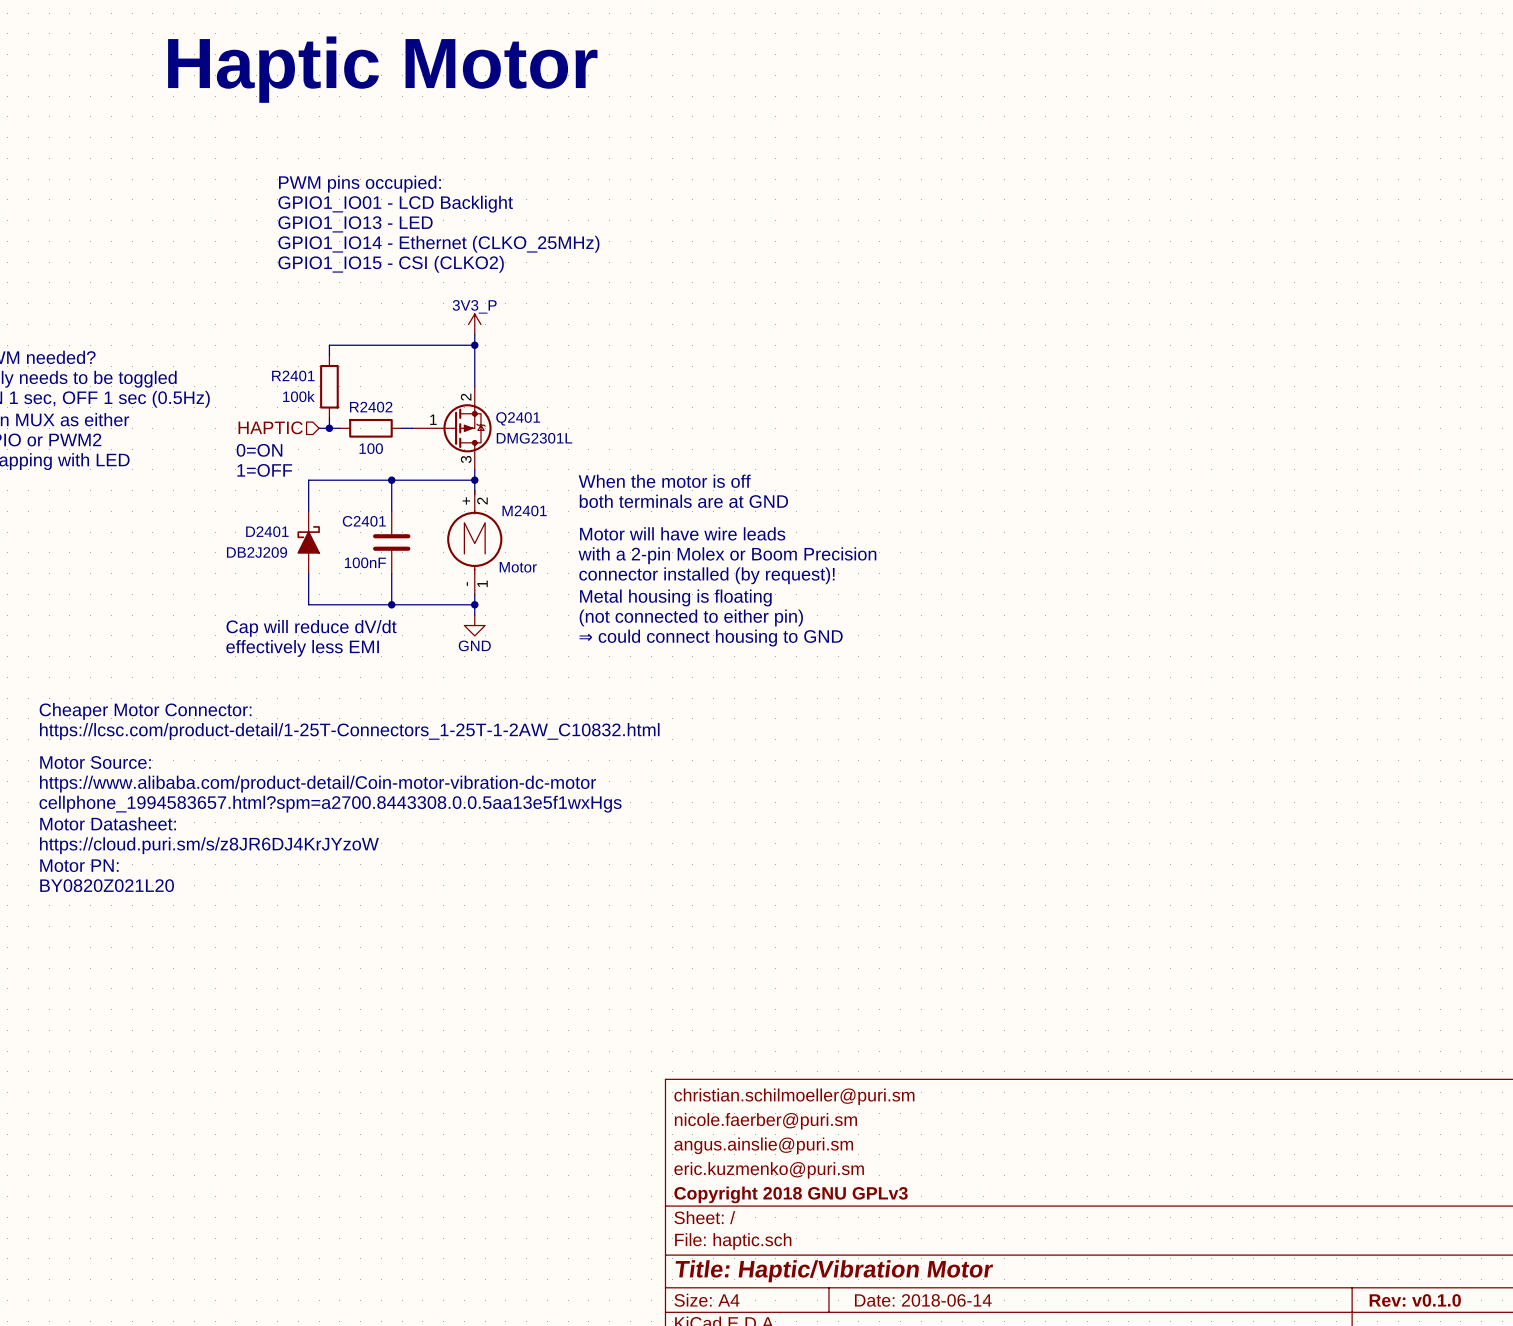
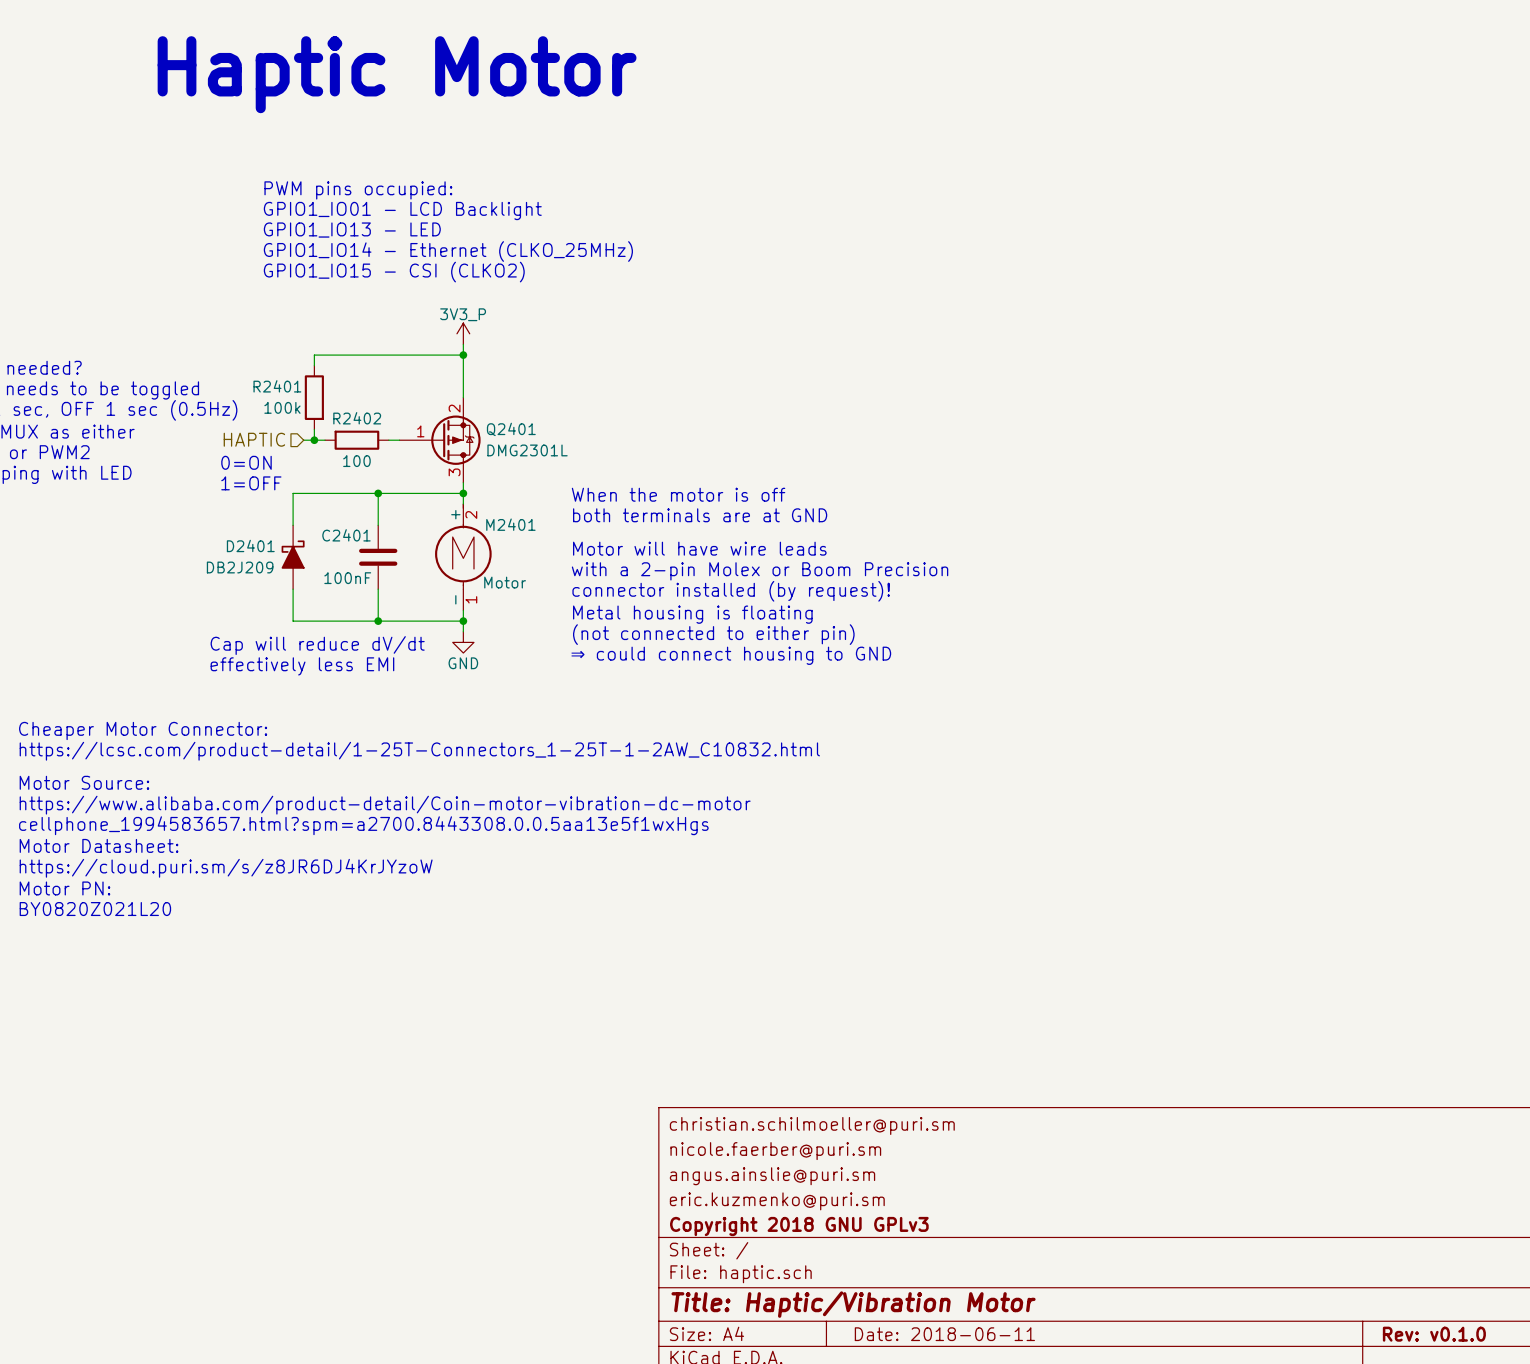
title block: Date: 2018-06-14 (923, 1300) -> Date: 2018-06-11 (944, 1334)

